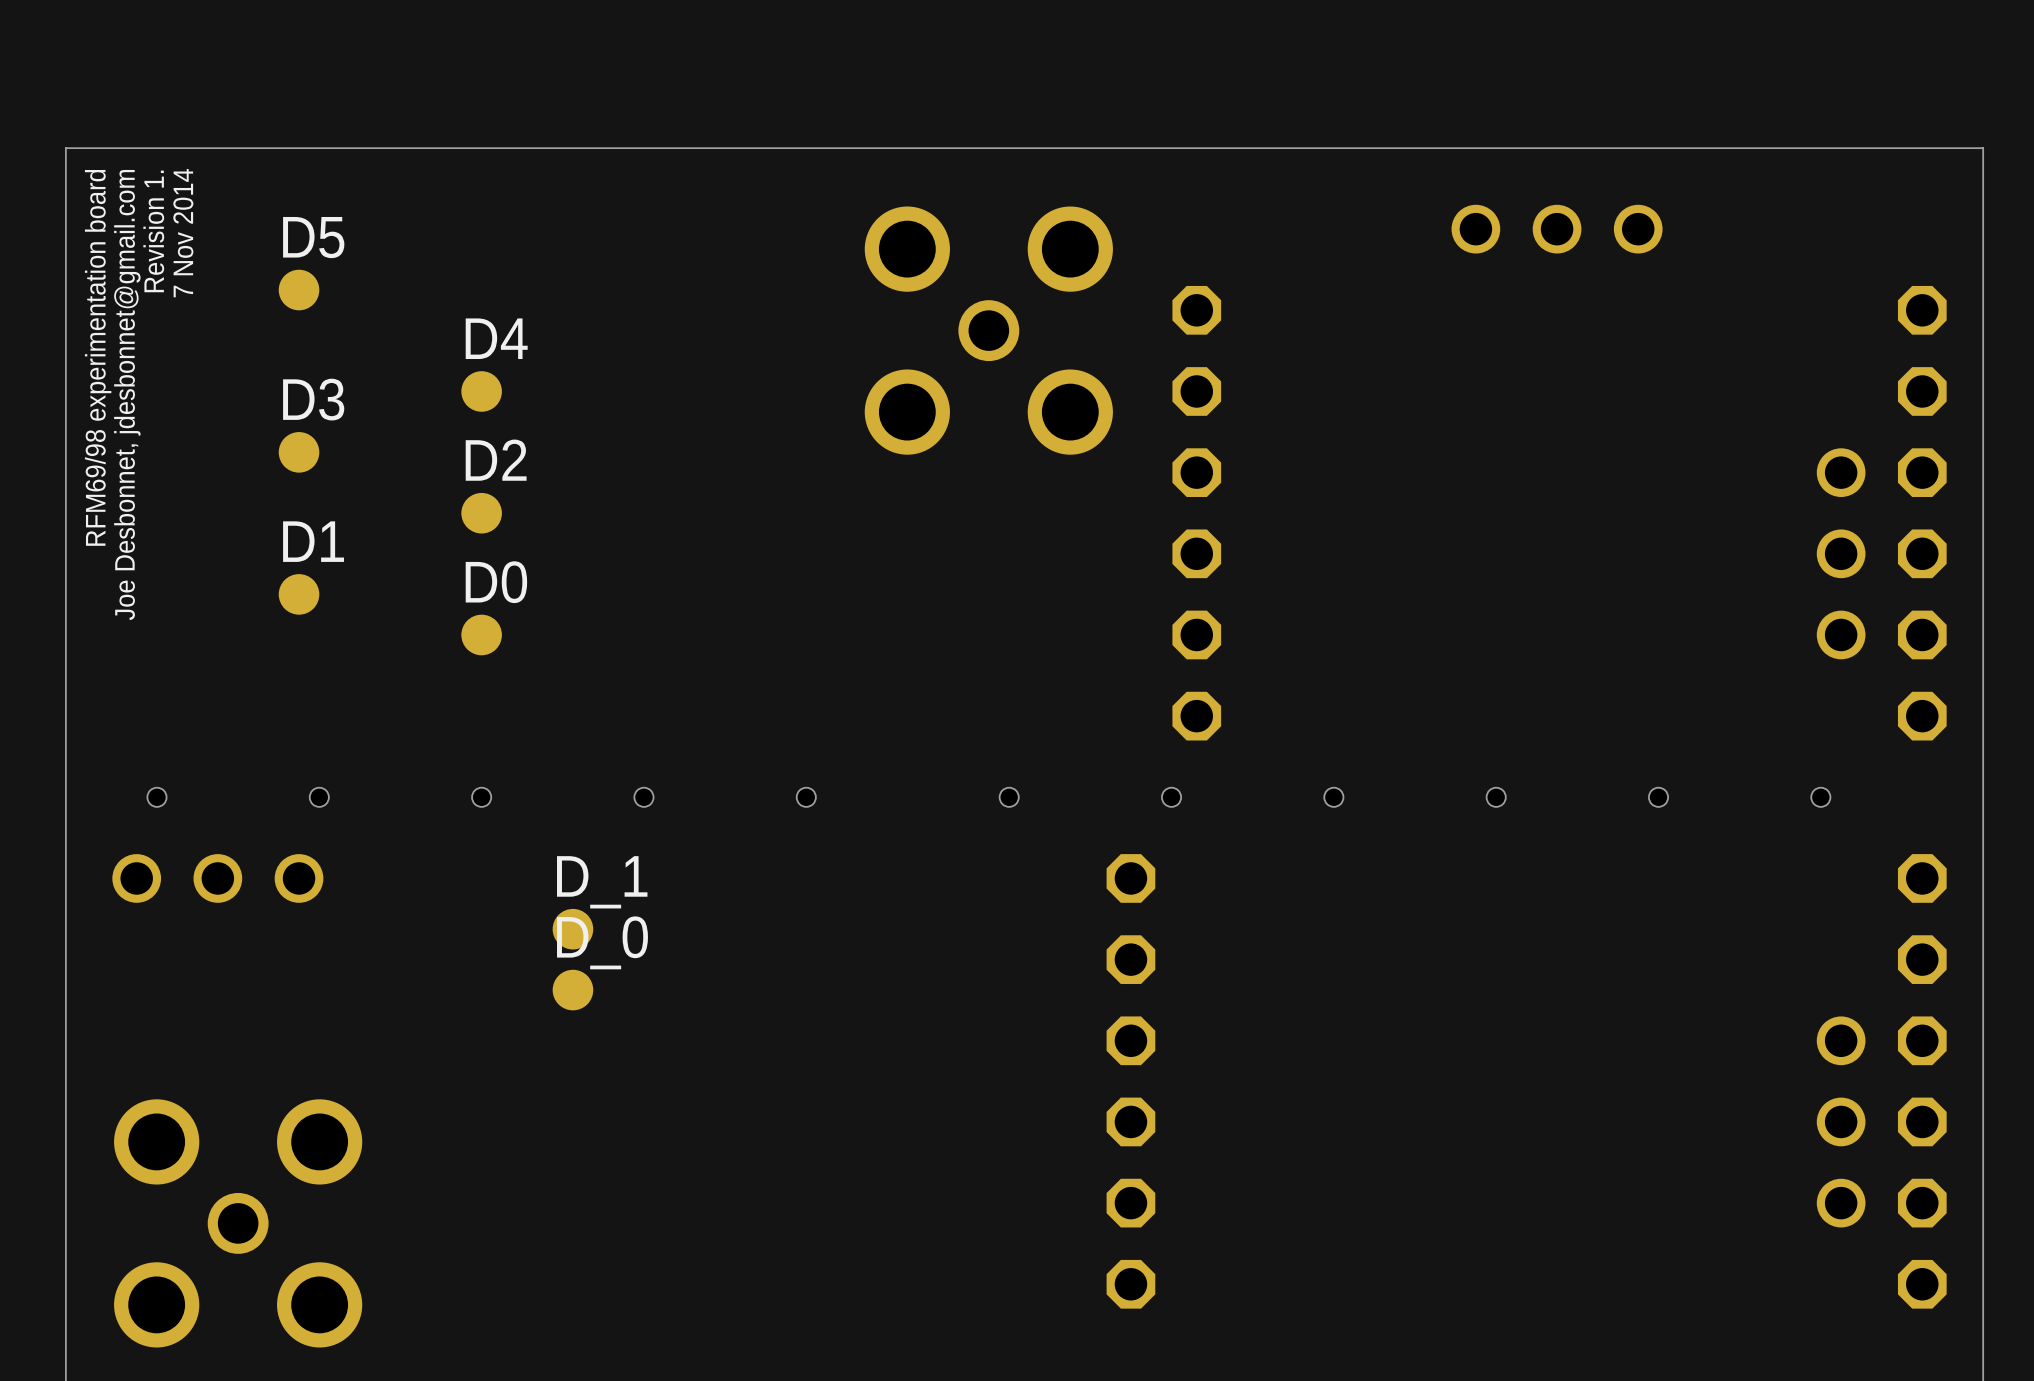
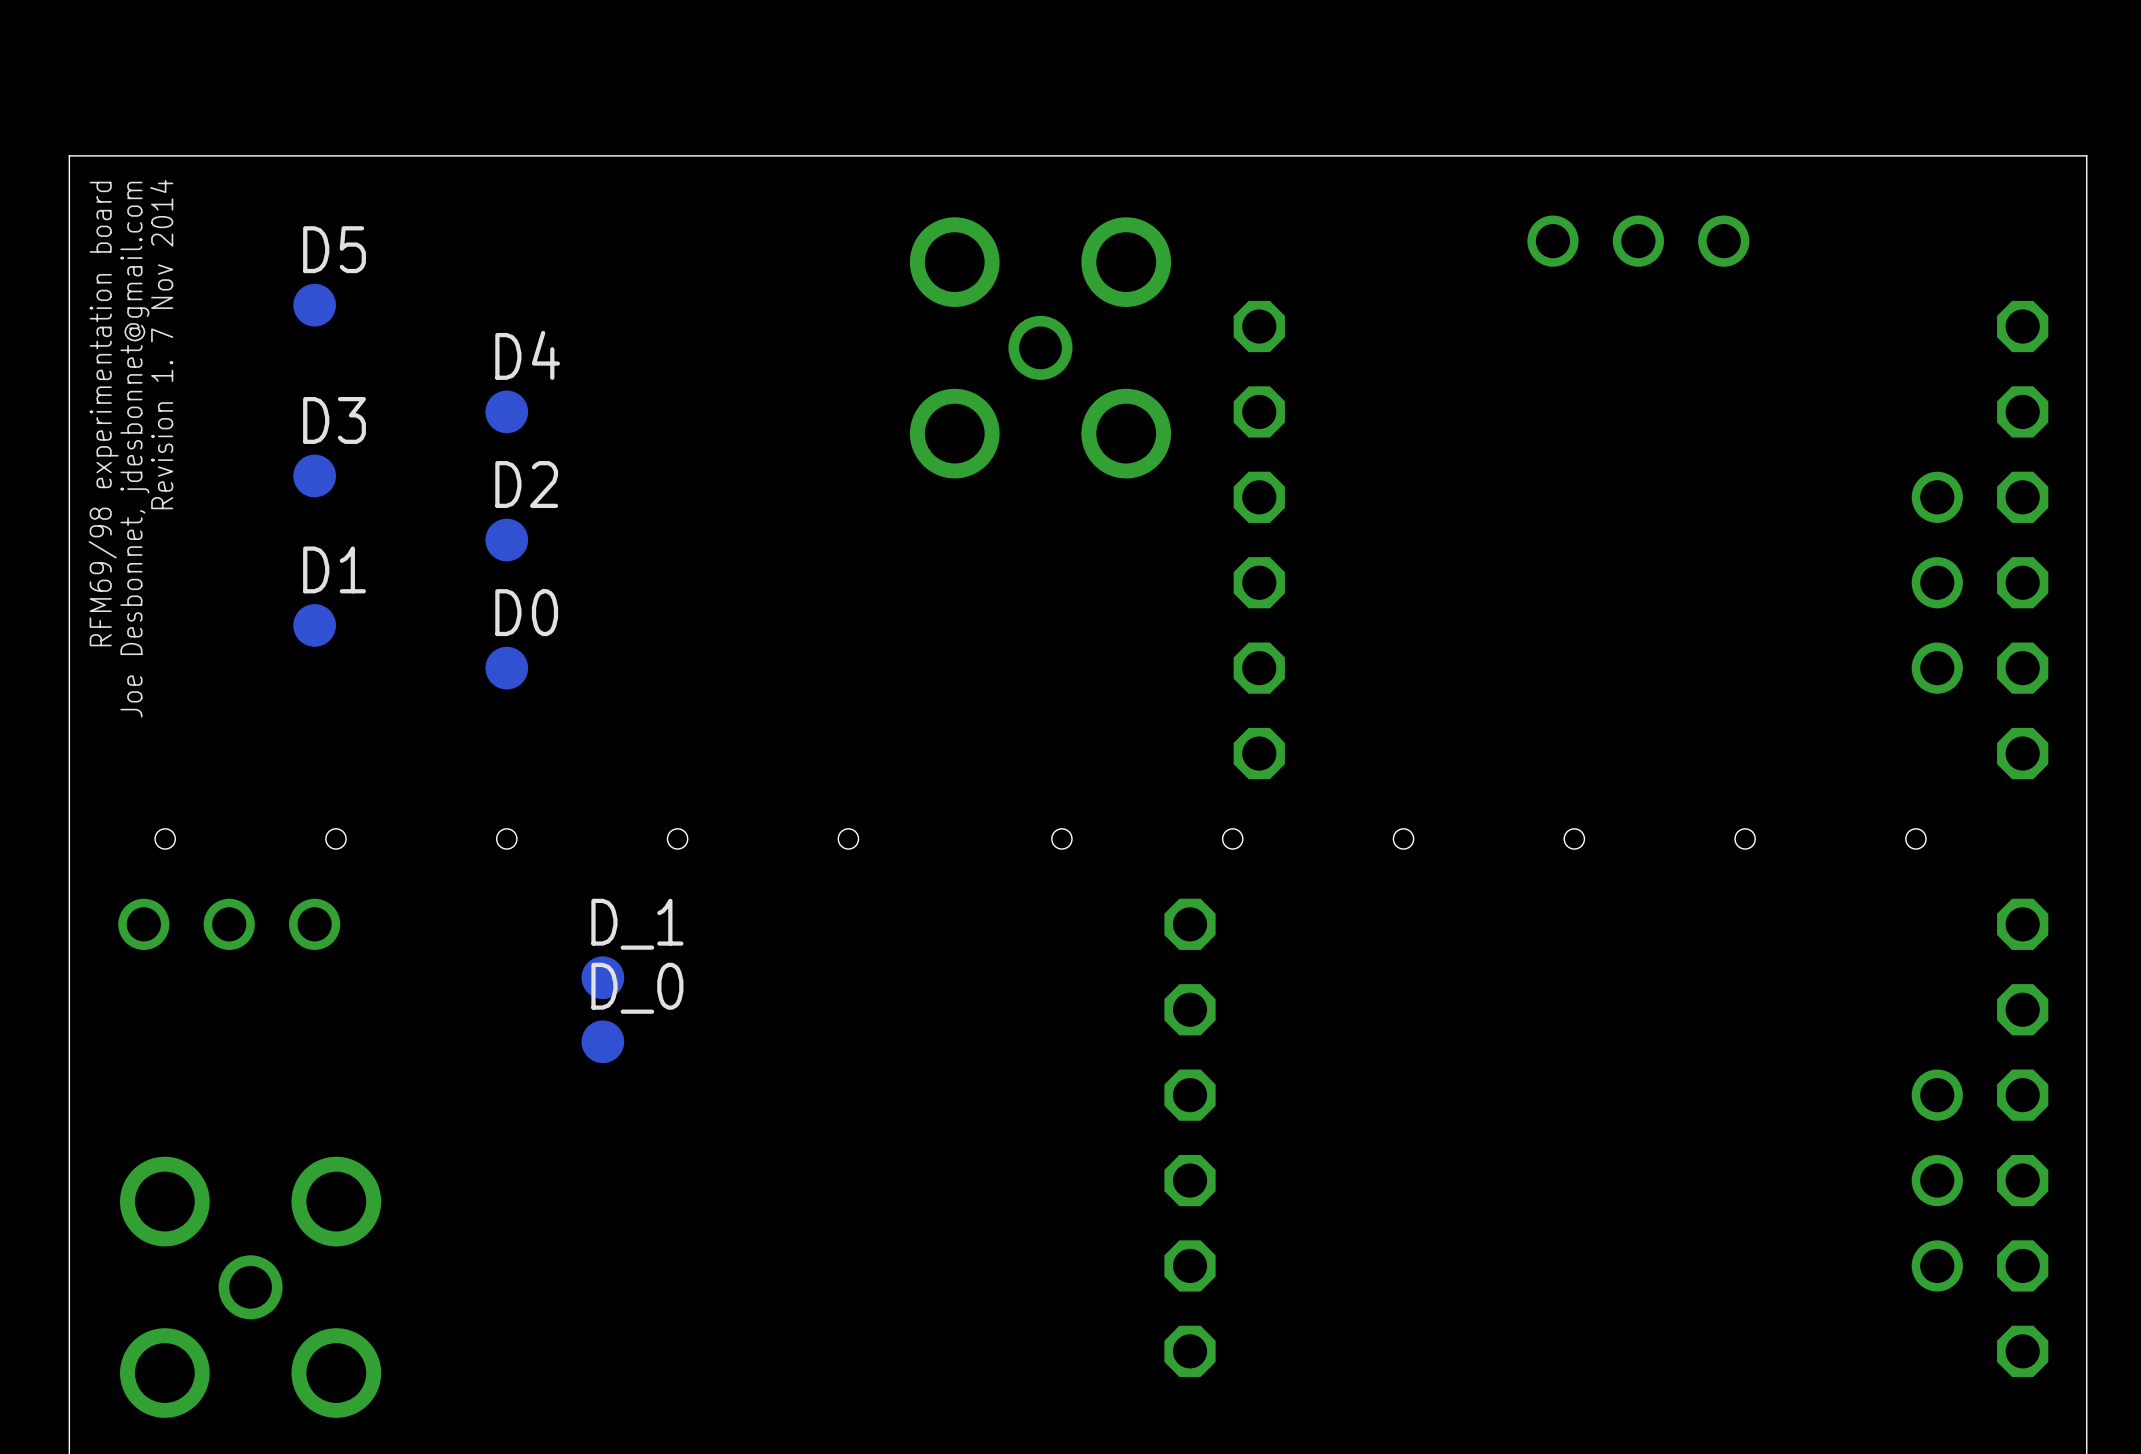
text: Revision 1. (153, 231) -> Revision 1. 7 Nov 2014 (161, 344)
text: 7 Nov 2014 (183, 233) -> none

